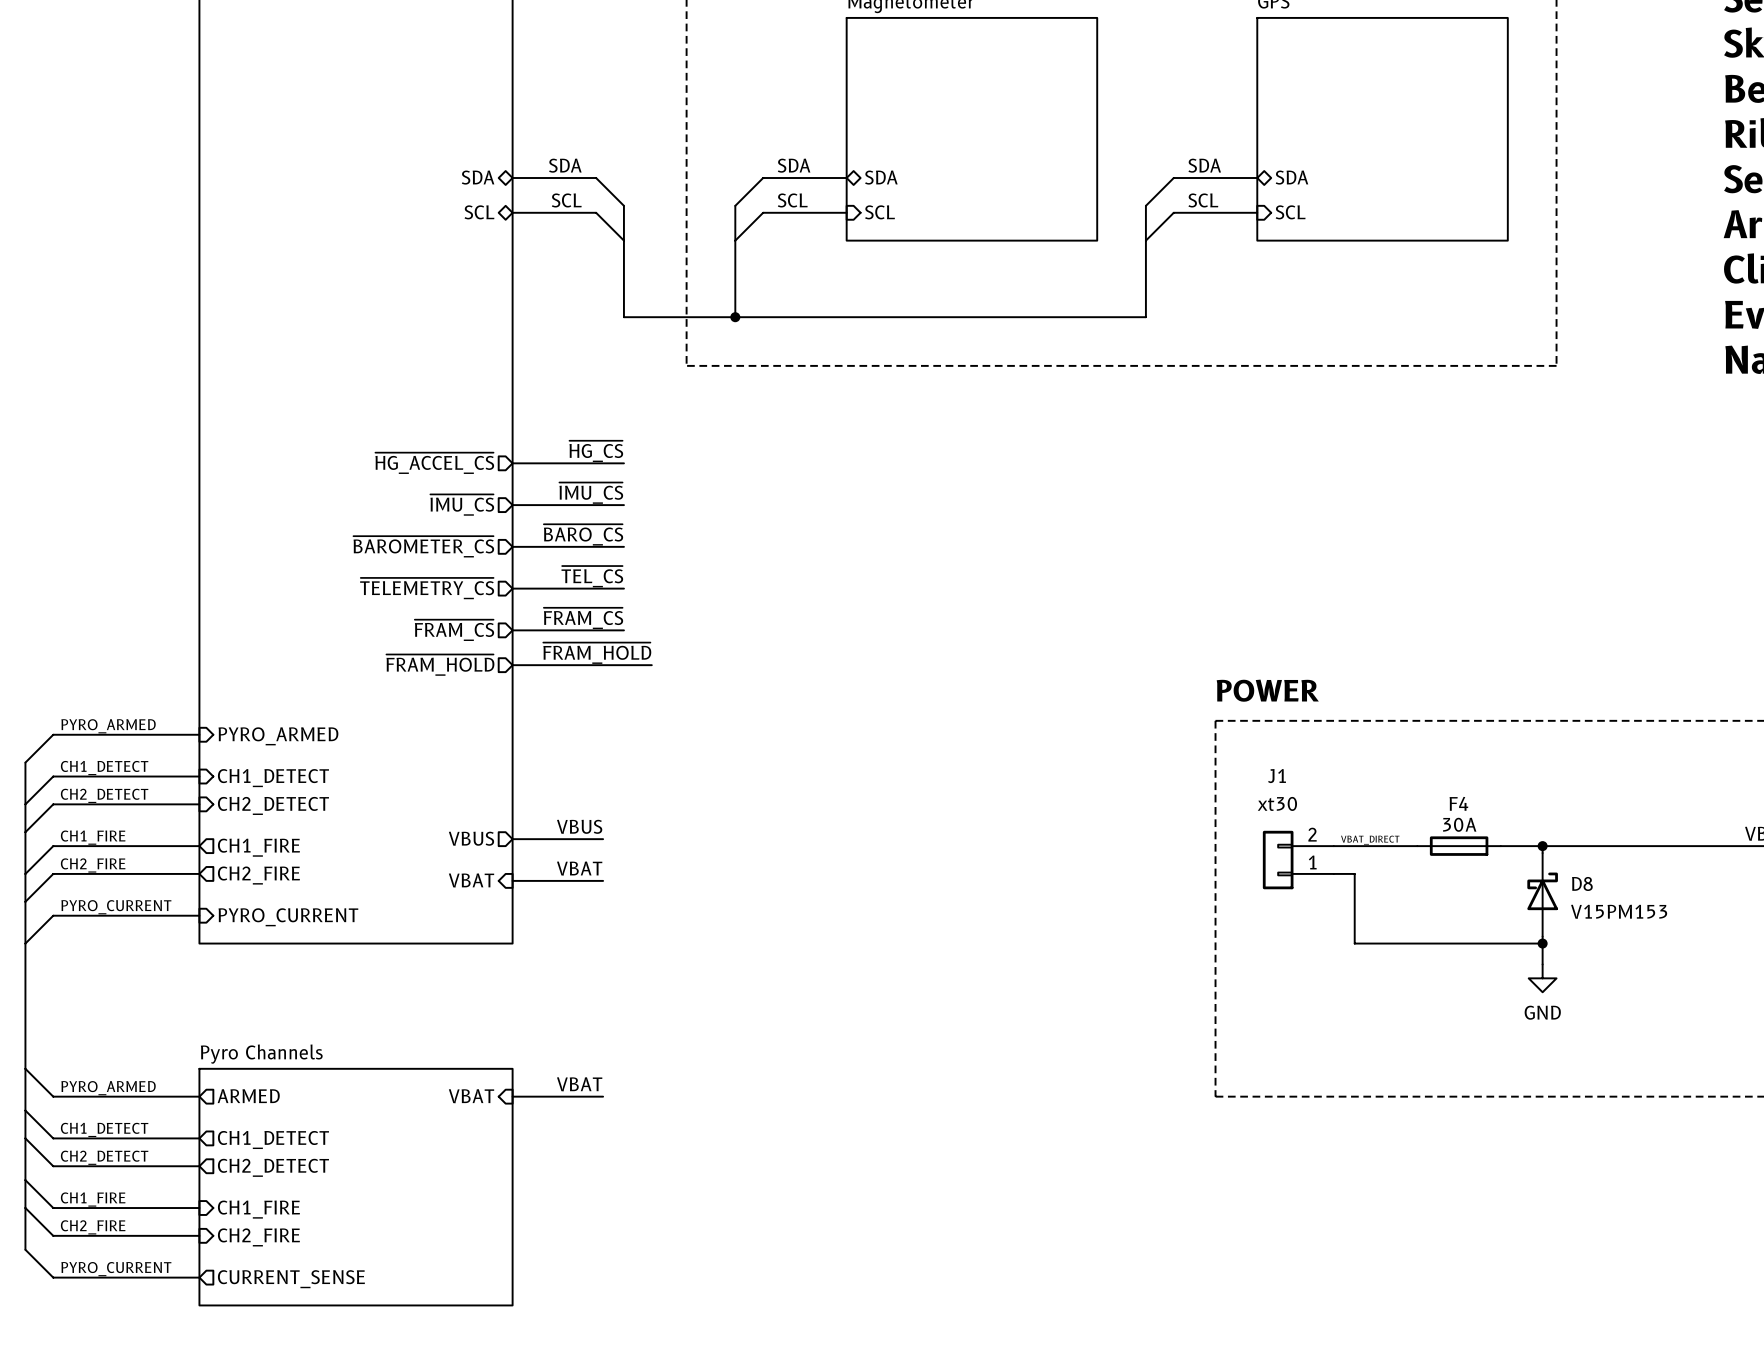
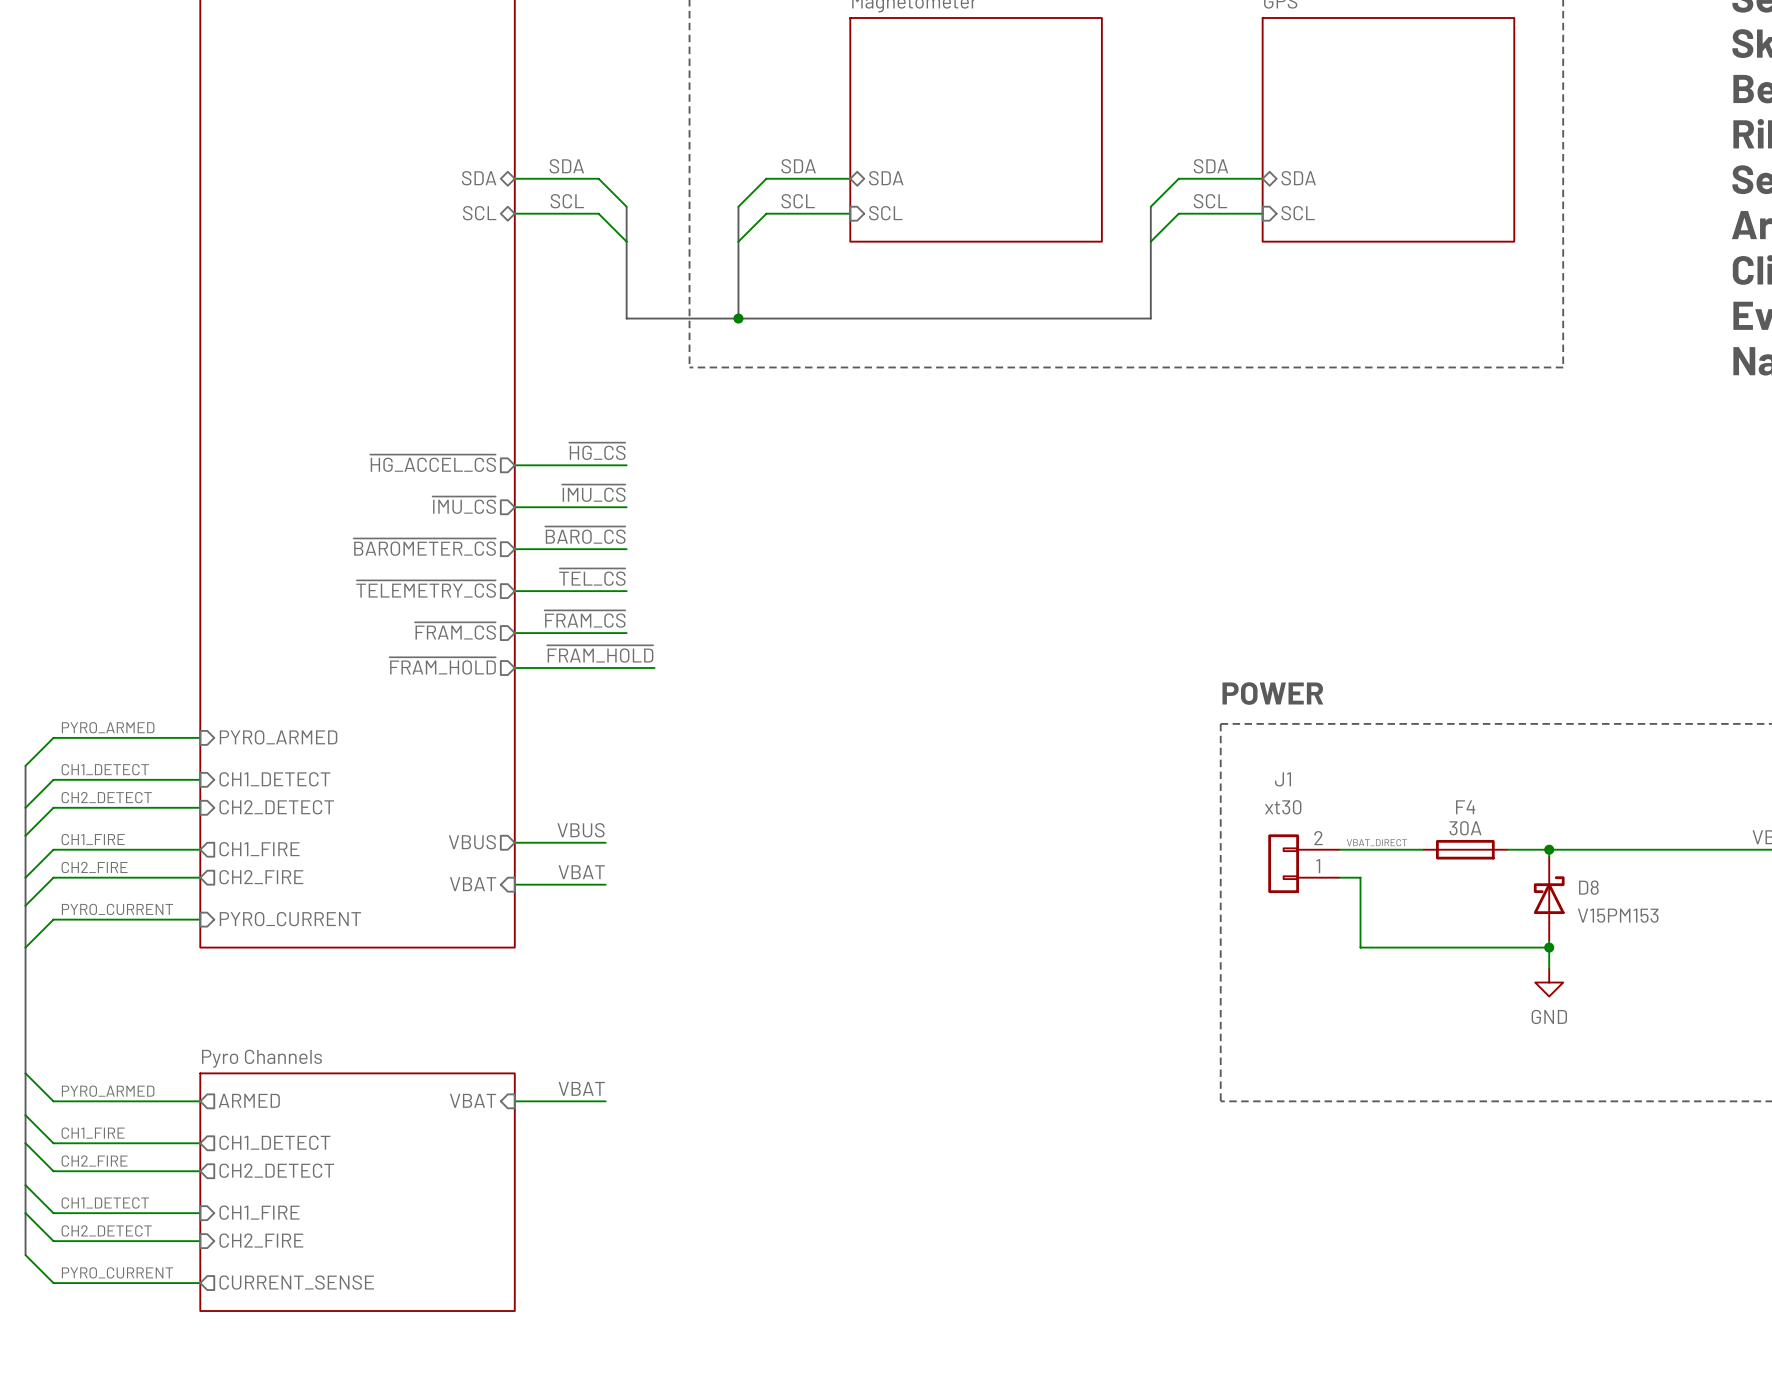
label: CH1_DETECT (104, 1129) -> CH1_FIRE (93, 1133)
label: CH2_DETECT (104, 1157) -> CH2_FIRE (94, 1161)
label: CH1_FIRE (93, 1199) -> CH1_DETECT (105, 1203)
label: CH2_FIRE (93, 1227) -> CH2_DETECT (106, 1230)

